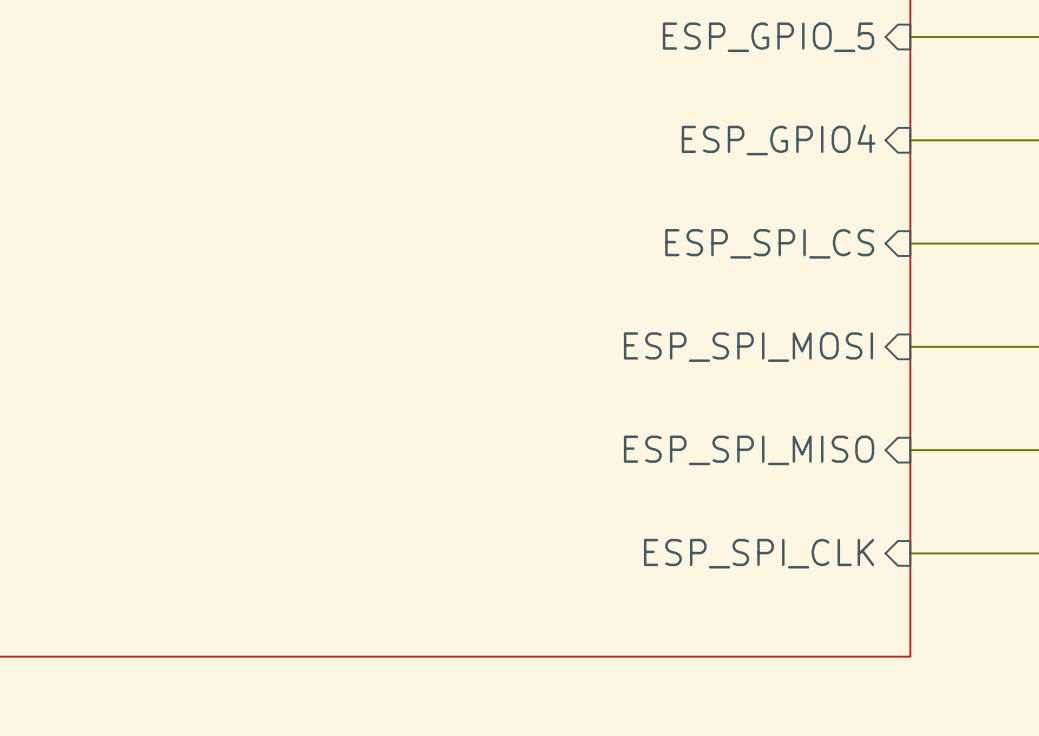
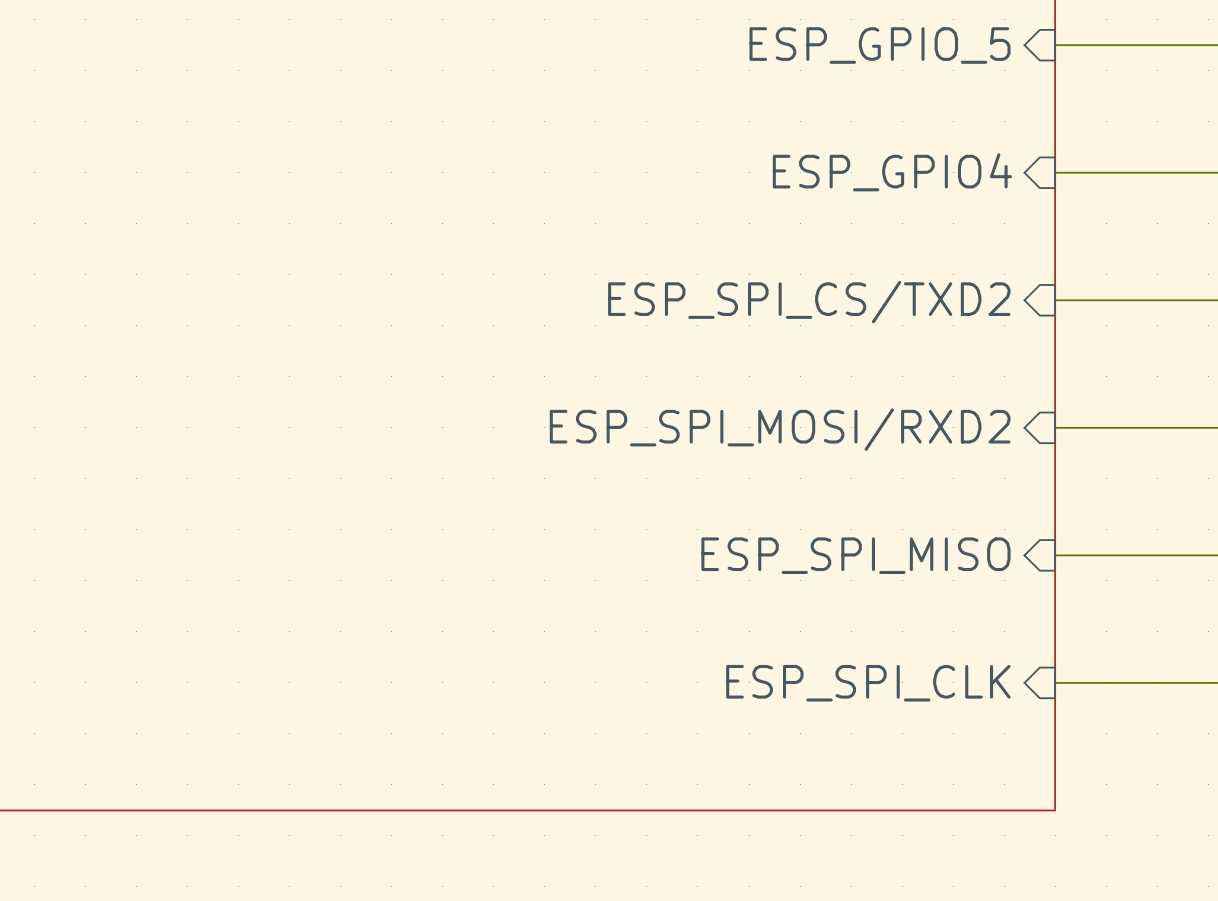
sheet pin: ESP_SPI_CS (769, 243) -> ESP_SPI_CS/TXD2 (809, 302)
sheet pin: ESP_SPI_MOSI (748, 347) -> ESP_SPI_MOSI/RXD2 (780, 429)

